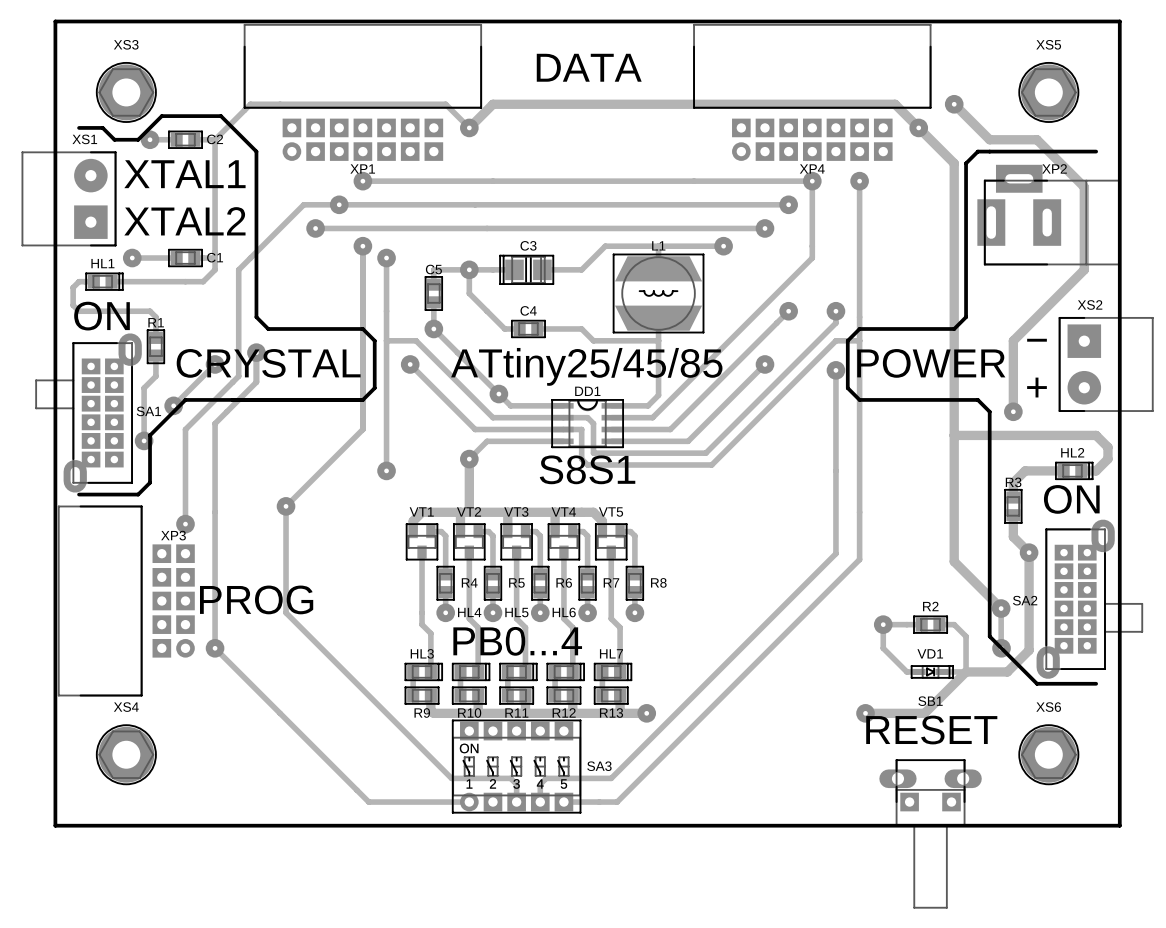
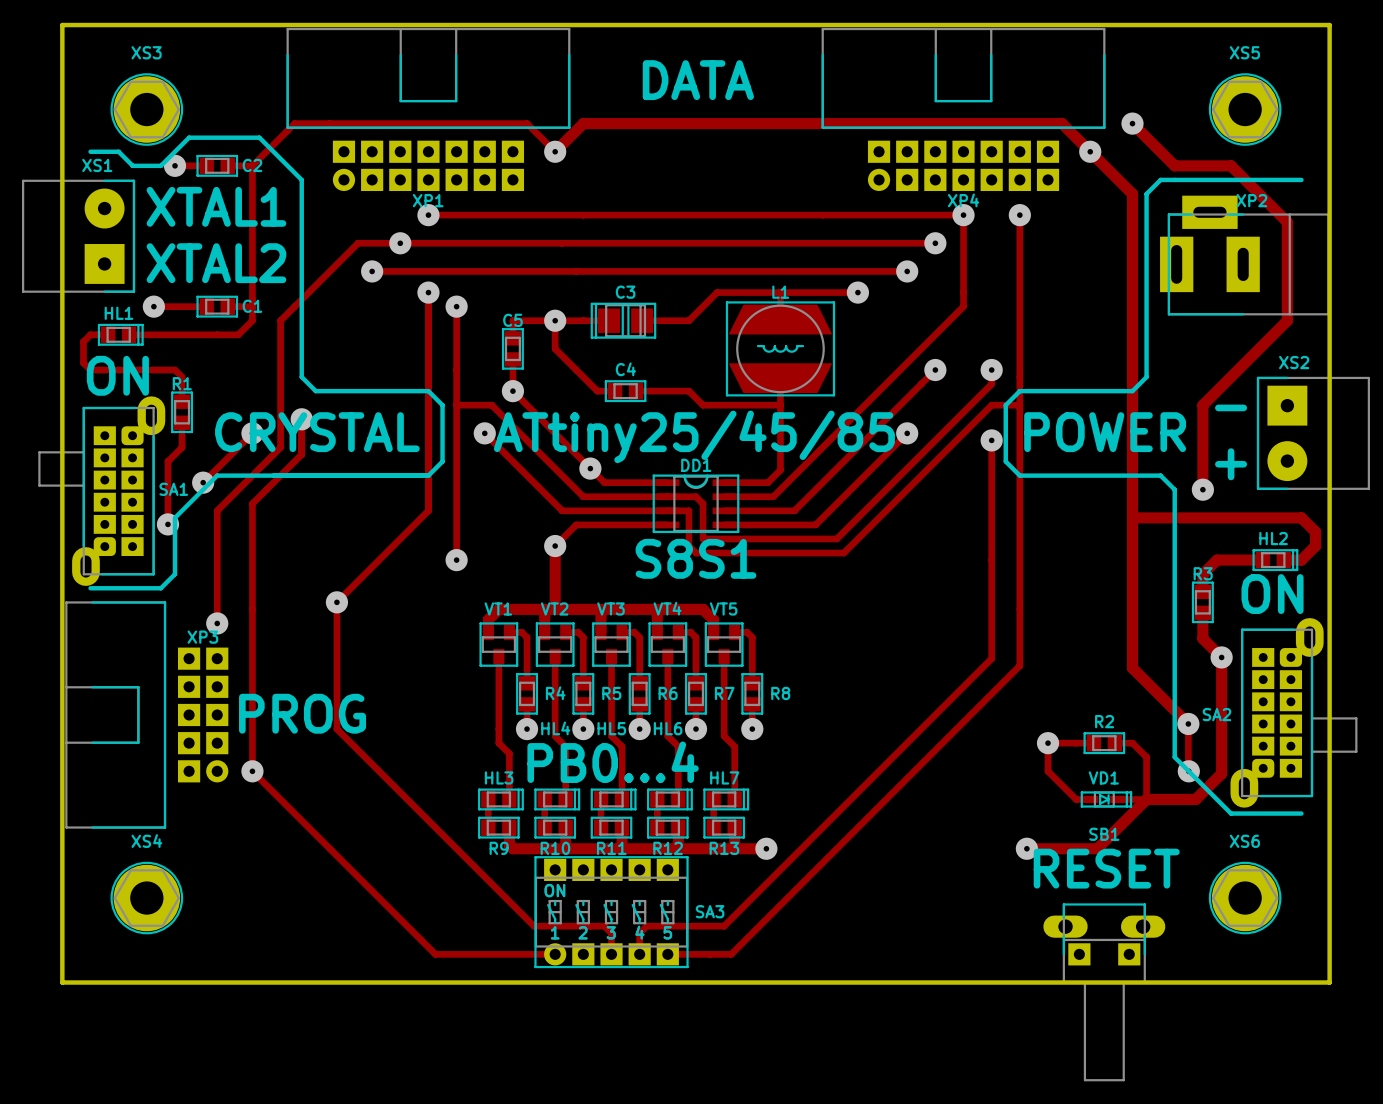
XP1 footprint: [243, 23, 483, 161] -> [286, 27, 571, 192]
XP4 footprint: [693, 23, 932, 161] -> [821, 27, 1106, 192]
SA1 footprint: [35, 333, 142, 493] -> [38, 396, 166, 586]
XP3 footprint: [57, 505, 195, 697] -> [65, 601, 229, 829]
SA2 footprint: [1036, 519, 1144, 679] -> [1230, 618, 1358, 808]

